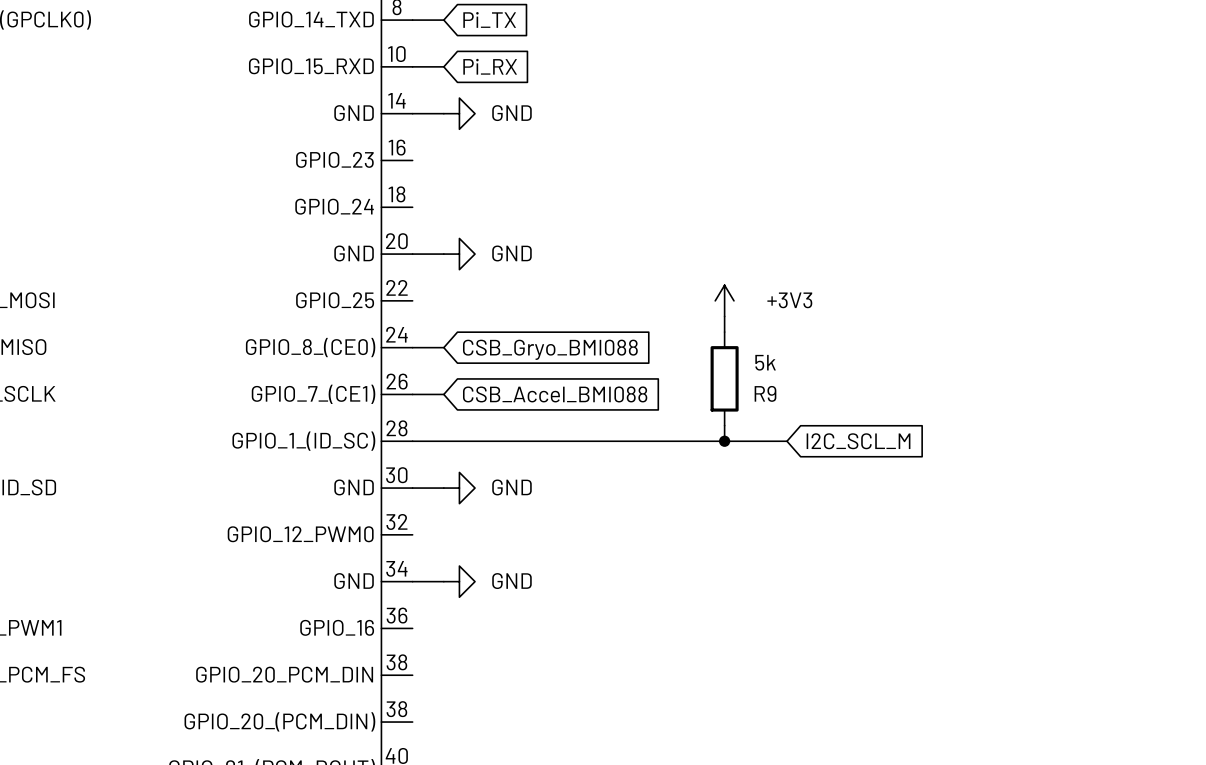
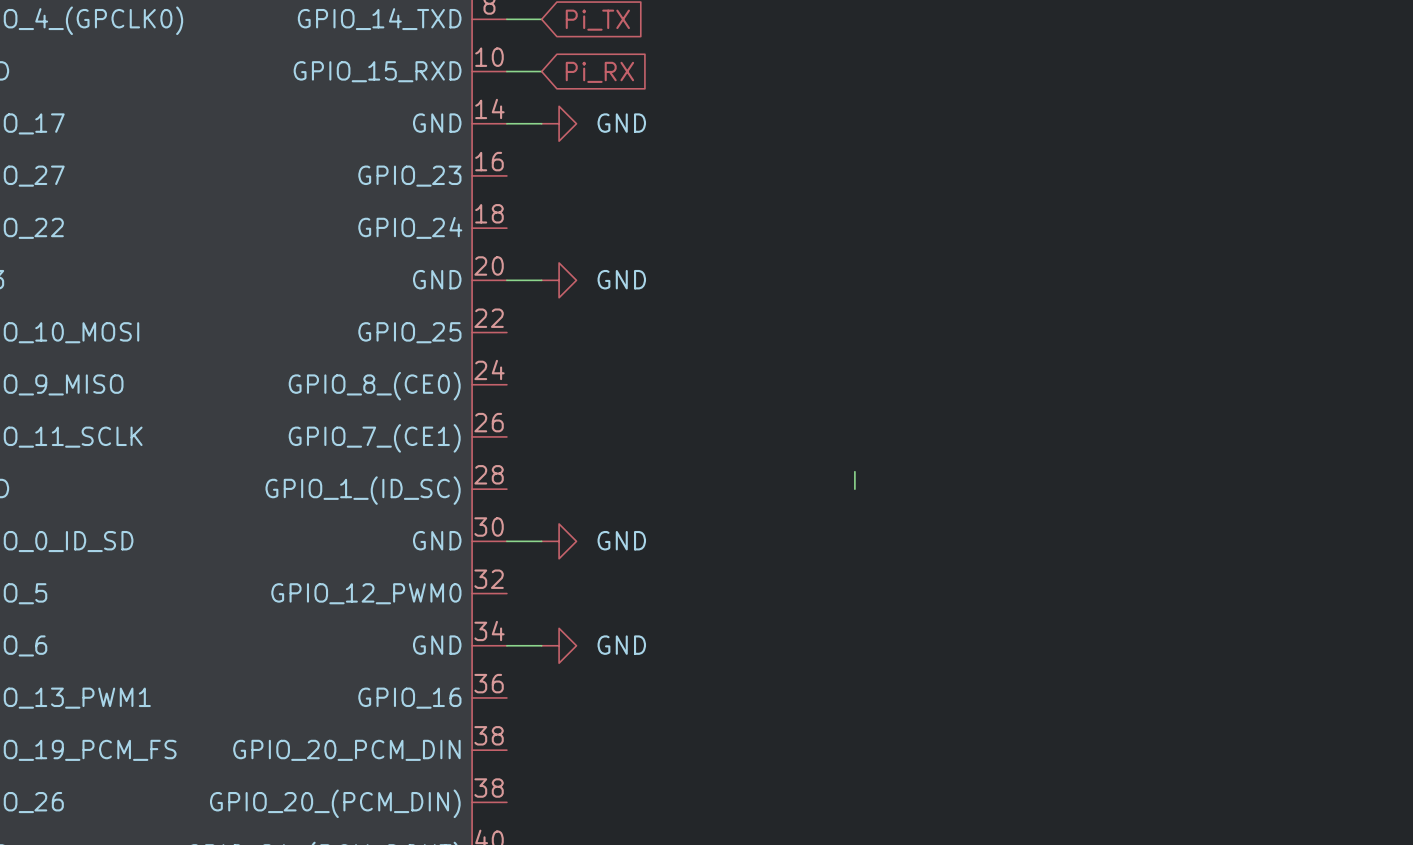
power symbol: +3V3 (724, 300) -> none
wire: (724, 316) (724, 332) -> none
wire: (412, 347) (443, 347) -> none
global label: CSB_Gryo_BMI088 (550, 349) -> none
R9: 5k (724, 378) -> none
wire: (412, 394) (443, 394) -> none
global label: CSB_Accel_BMI088 (555, 394) -> none
wire: (412, 441) (787, 441) -> none
junction: (724, 441) -> none
global label: I2C_SCL_M (858, 441) -> none

